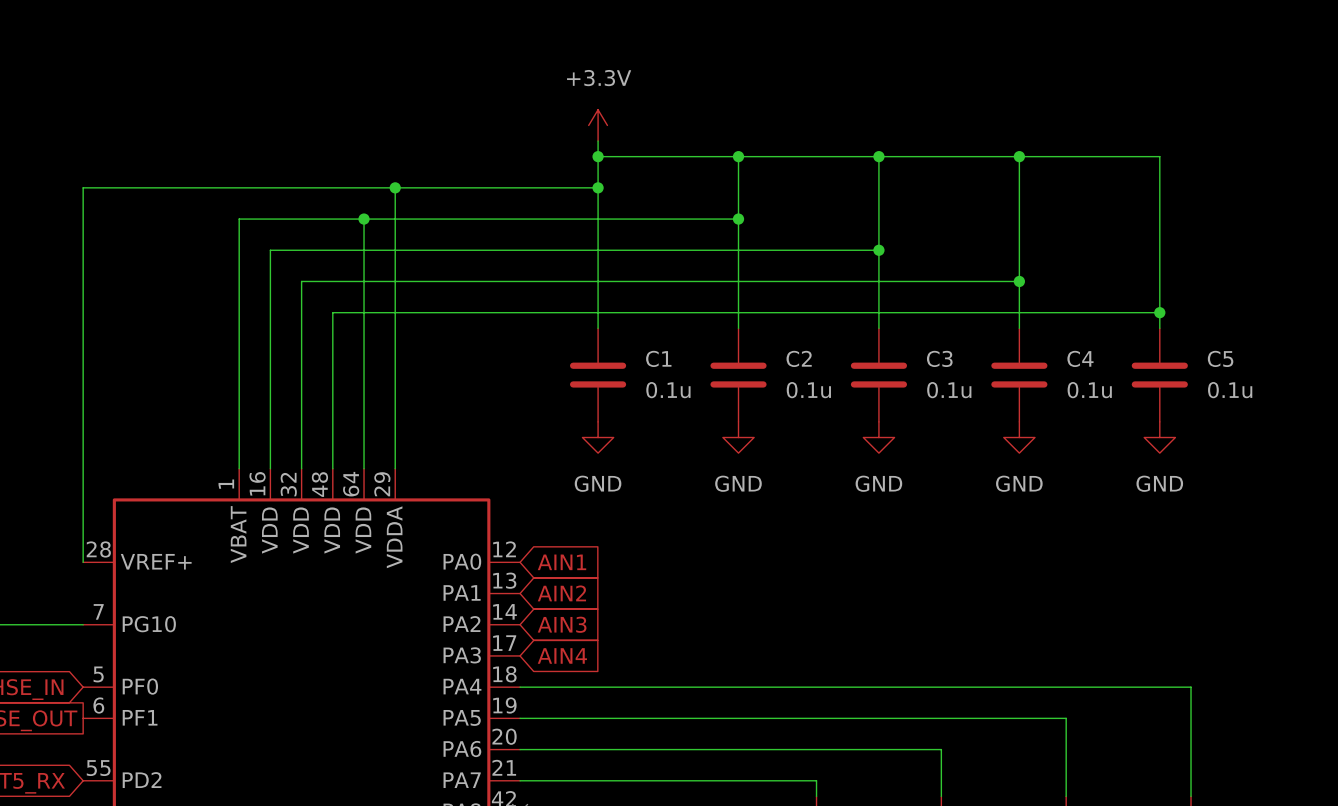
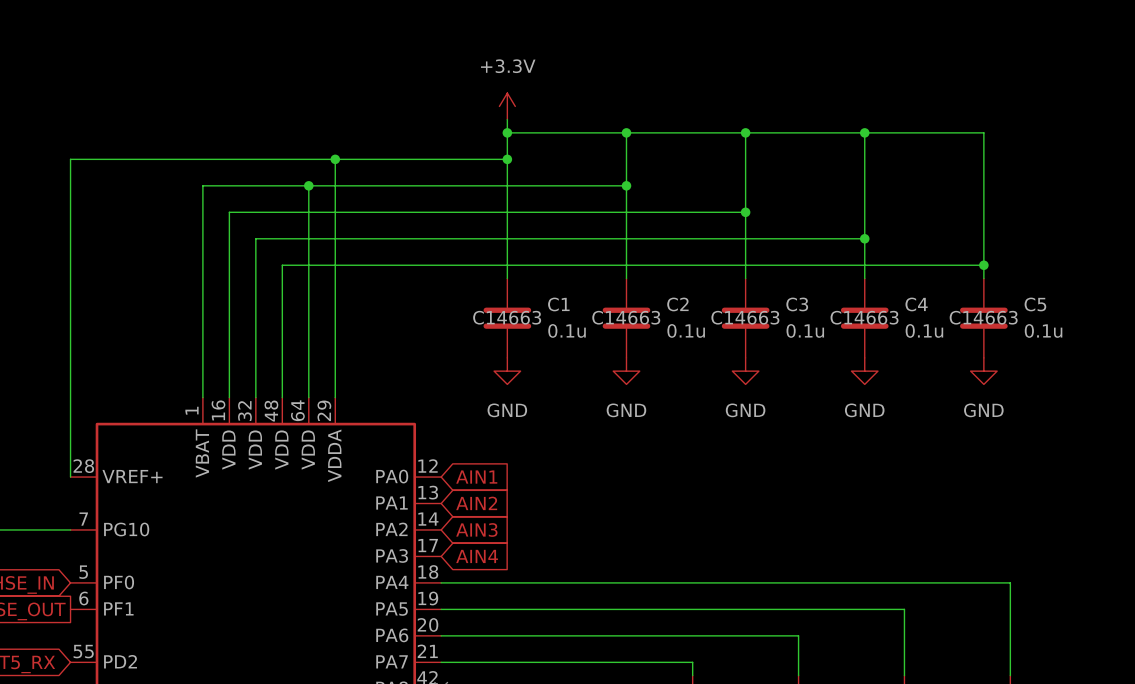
C1 text: none -> C14663 (507, 317)
C2 text: none -> C14663 (626, 317)
C3 text: none -> C14663 (745, 317)
C4 text: none -> C14663 (864, 317)
C5 text: none -> C14663 (983, 317)

